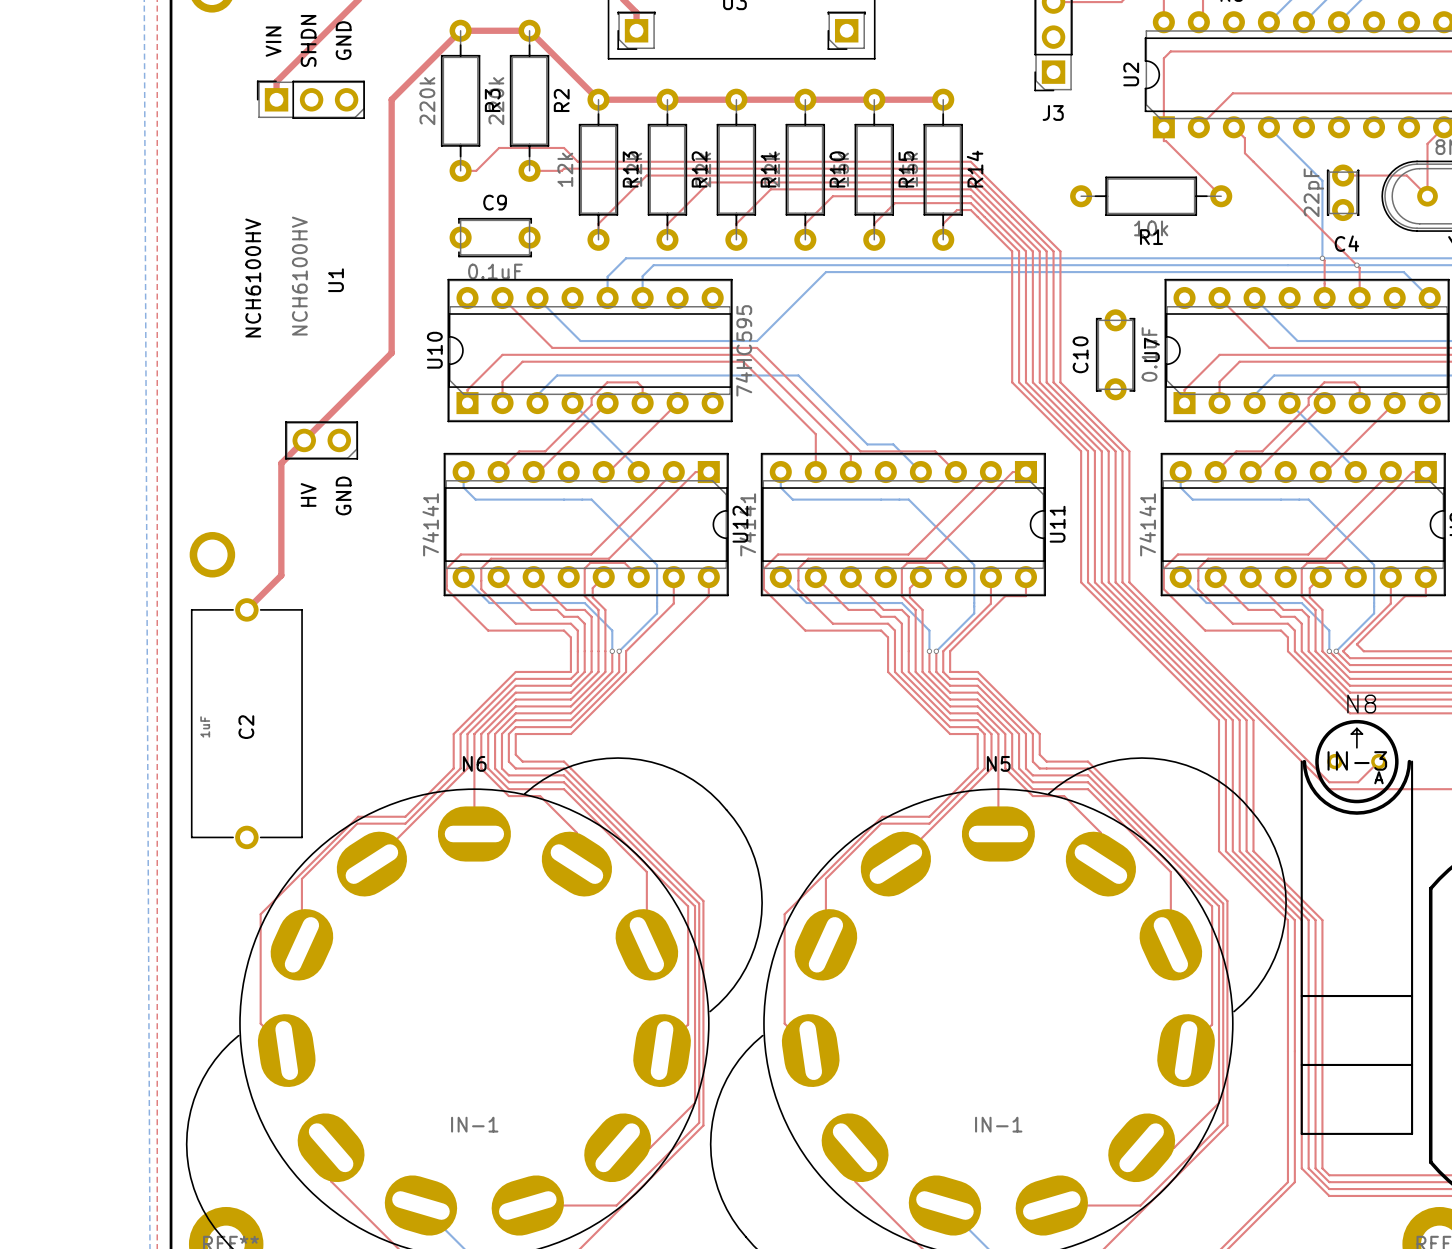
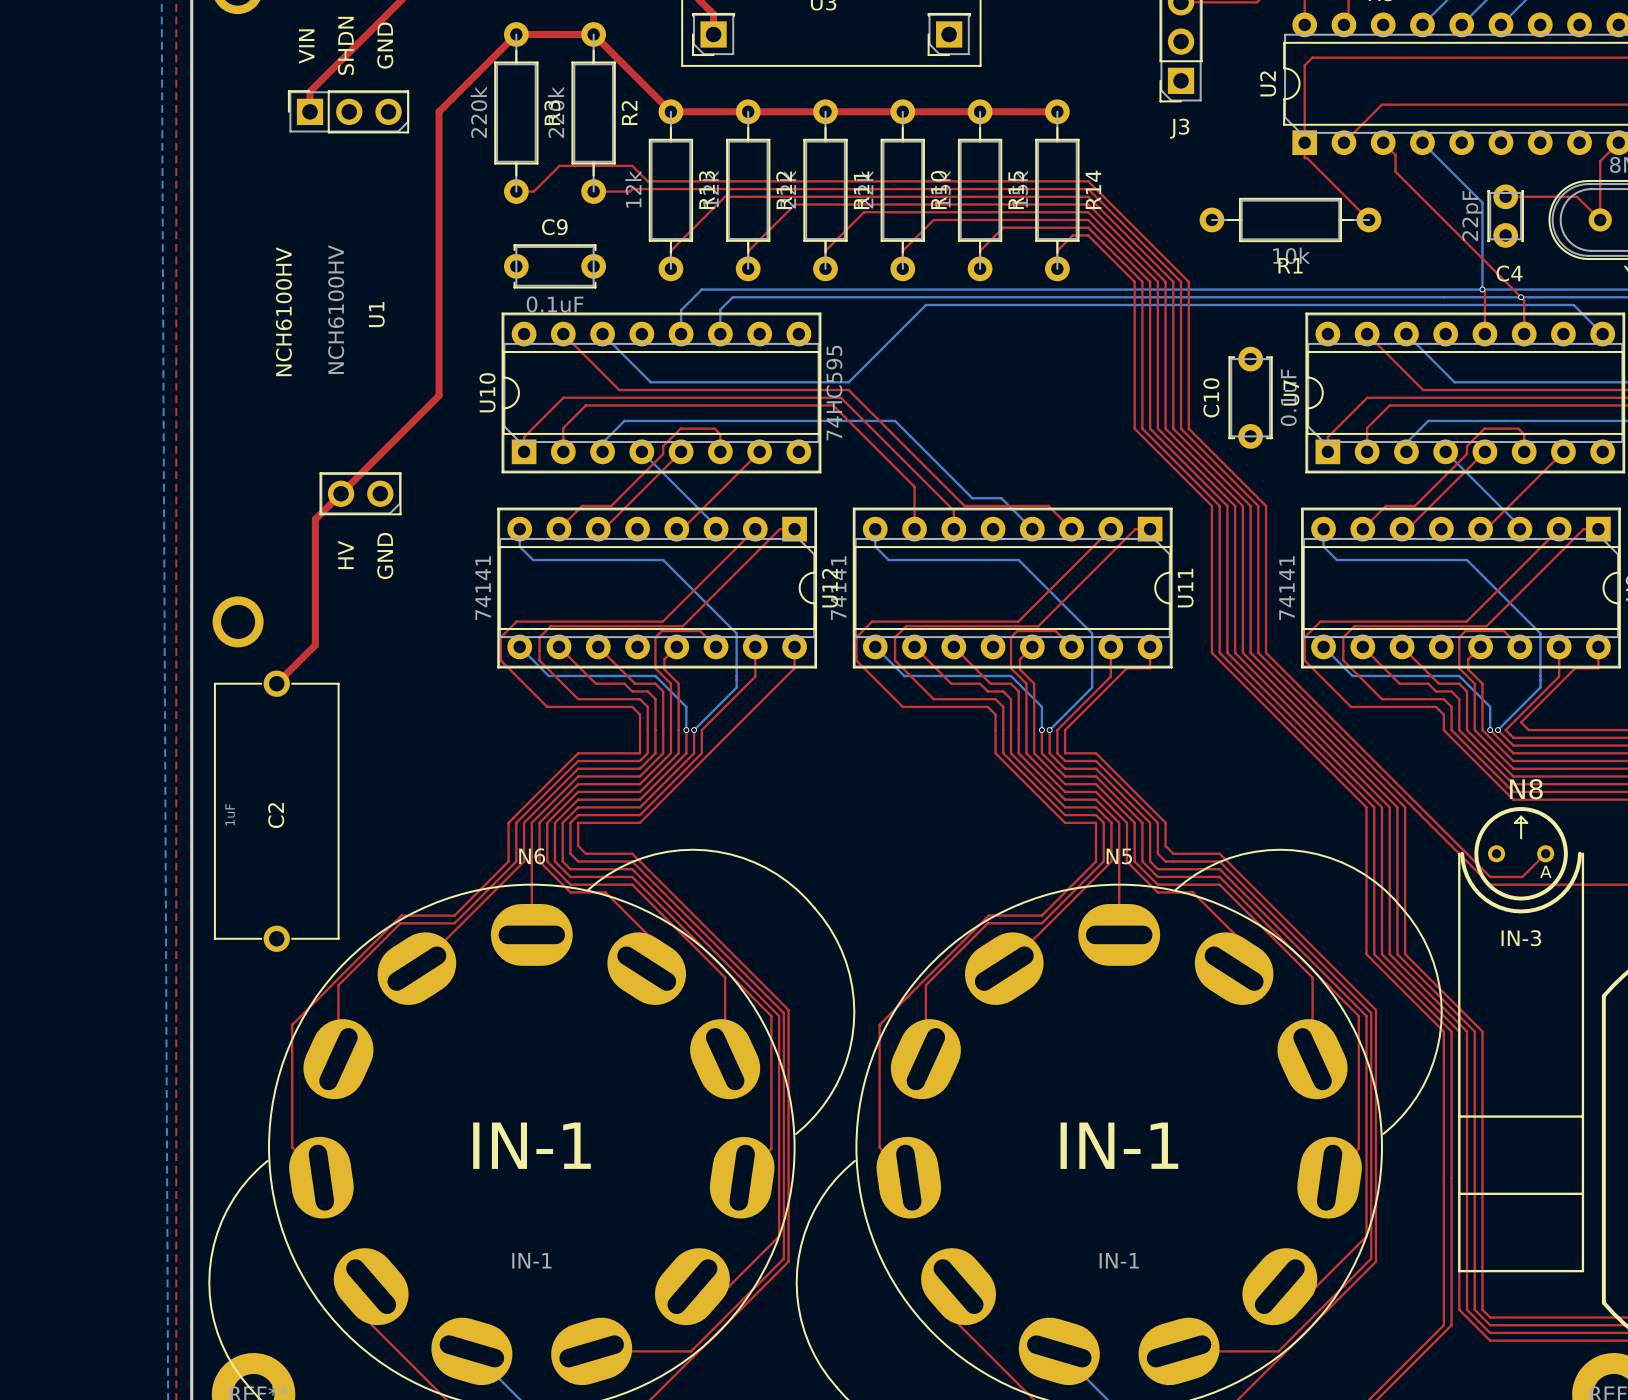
N8 value: IN-3 (1357, 760) -> none
text: none -> IN-3 (1521, 938)
text: none -> IN-1 (531, 1145)
text: none -> IN-1 (1119, 1145)

